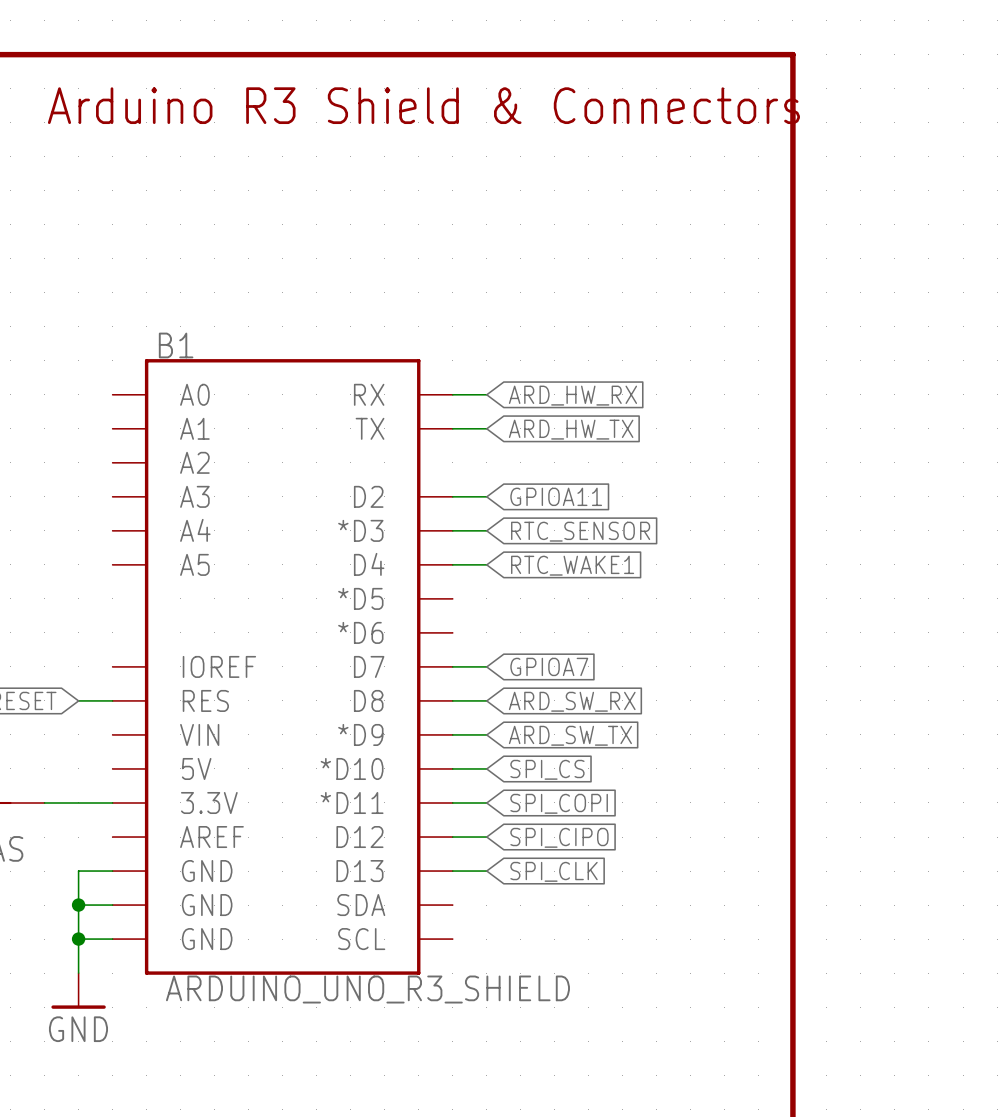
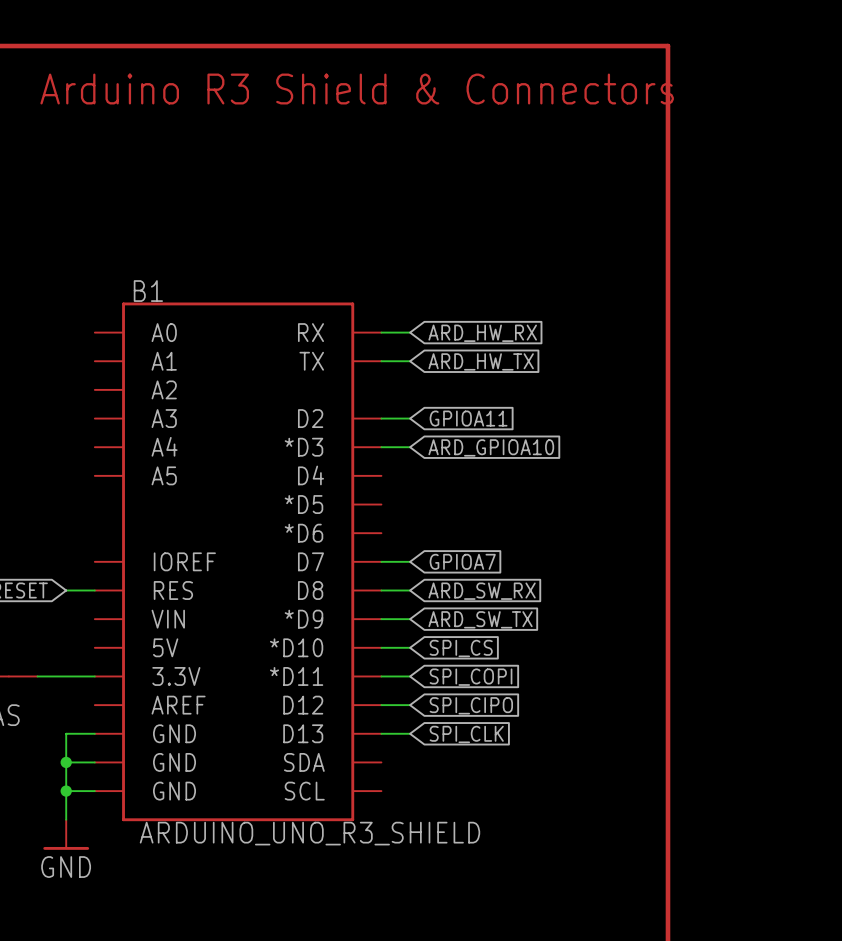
global label: RTC_SENSOR (580, 531) -> ARD_GPIOA10 (491, 447)
wire: (452, 564) (486, 564) -> none
global label: RTC_WAKE1 (572, 565) -> none

